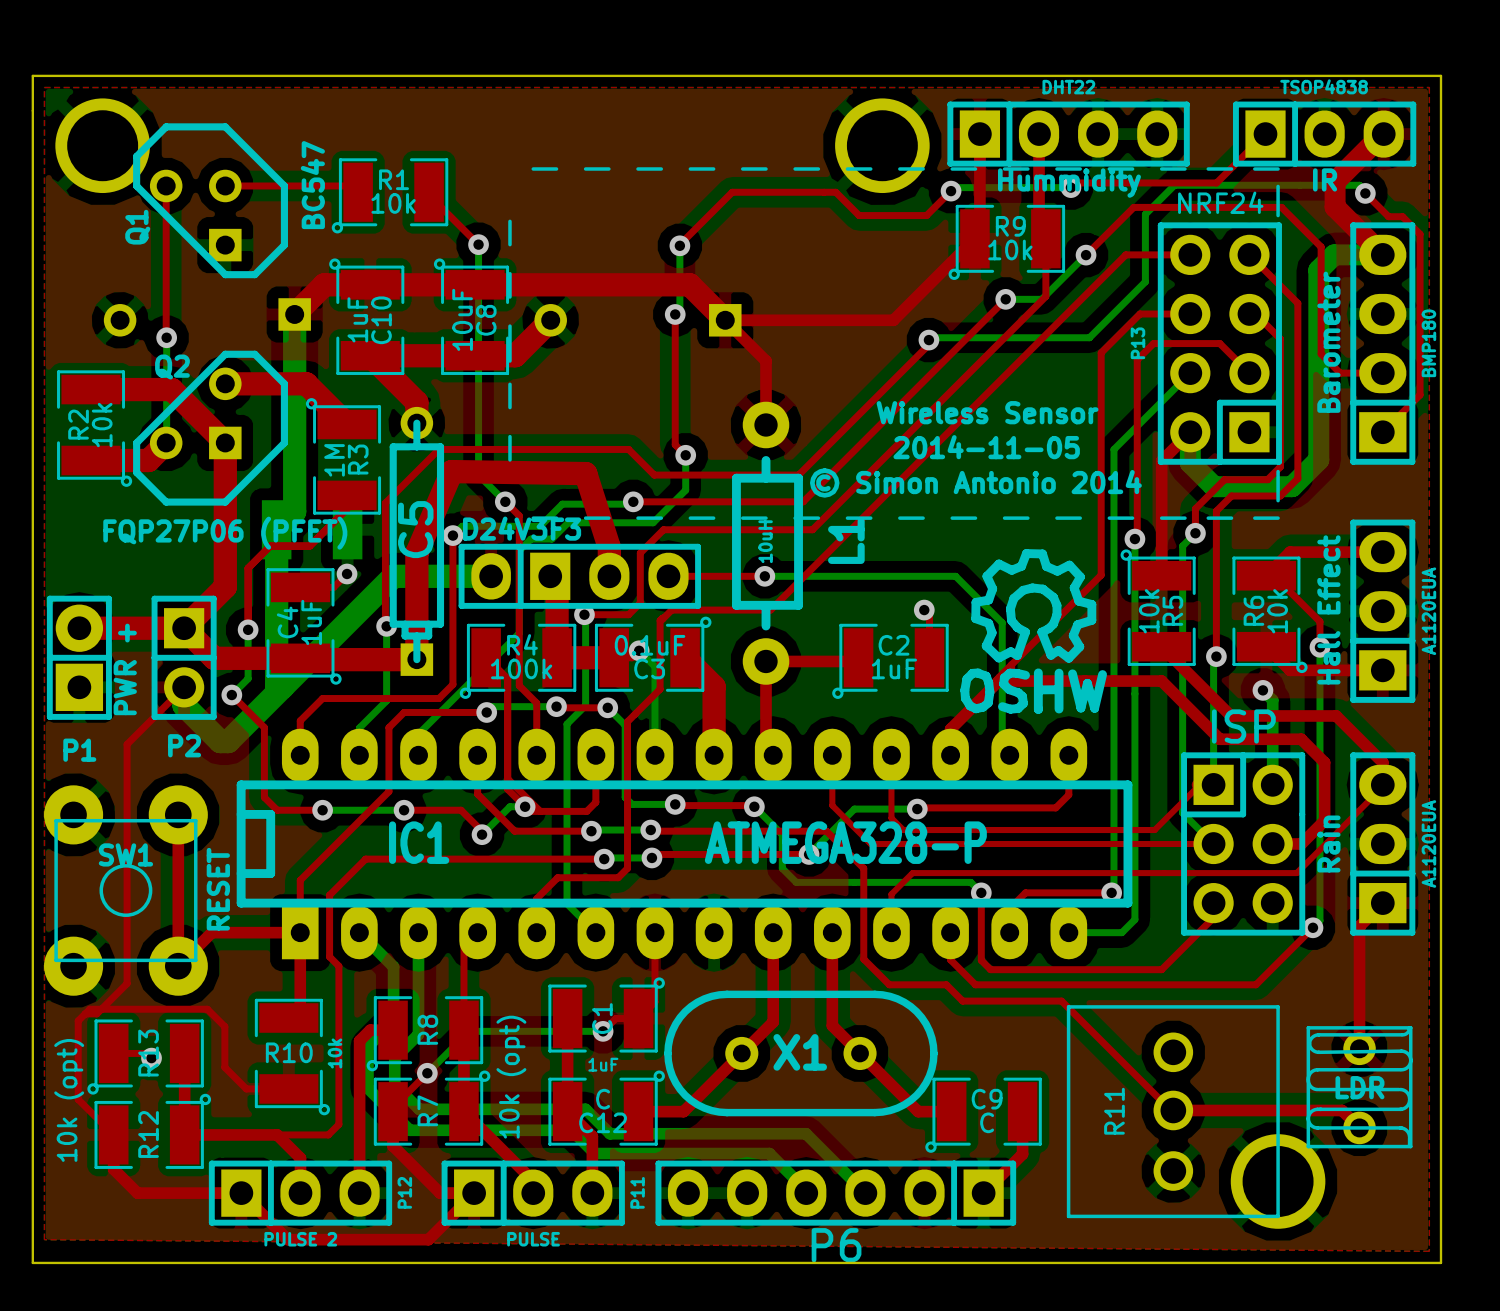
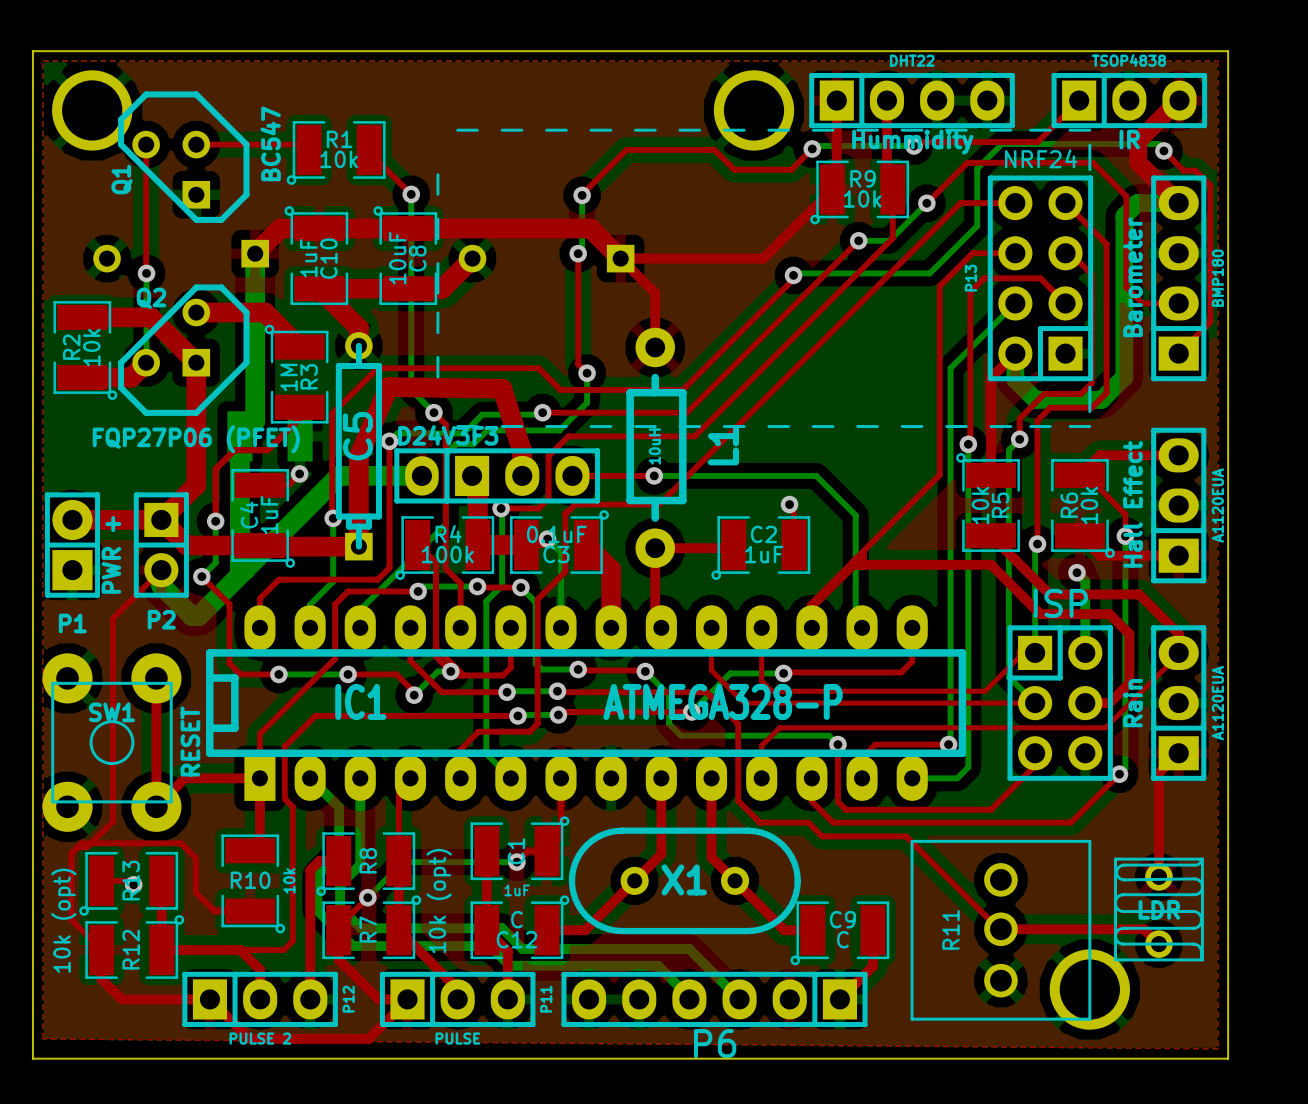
text: Wireless Sensor (987, 412) -> none
text: 2014-11-05 (986, 447) -> none
text: © Simon Antonio 2014 (975, 482) -> none
drawing: [960, 549, 1107, 714] -> none

